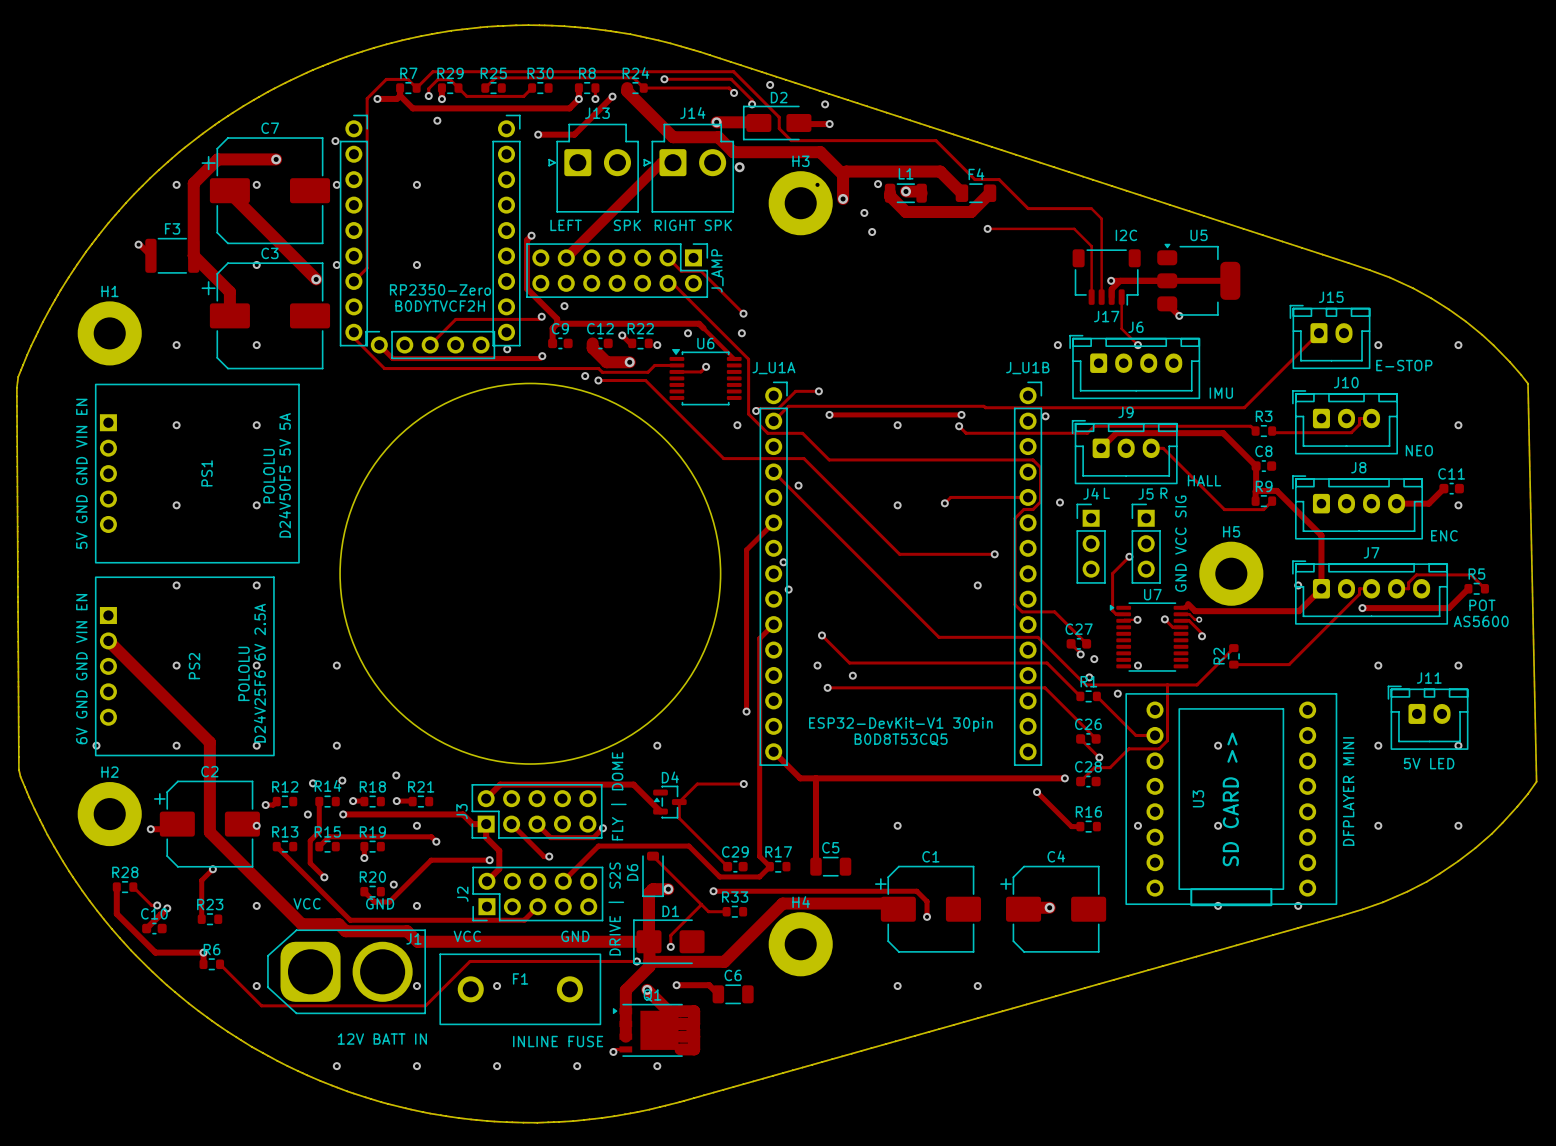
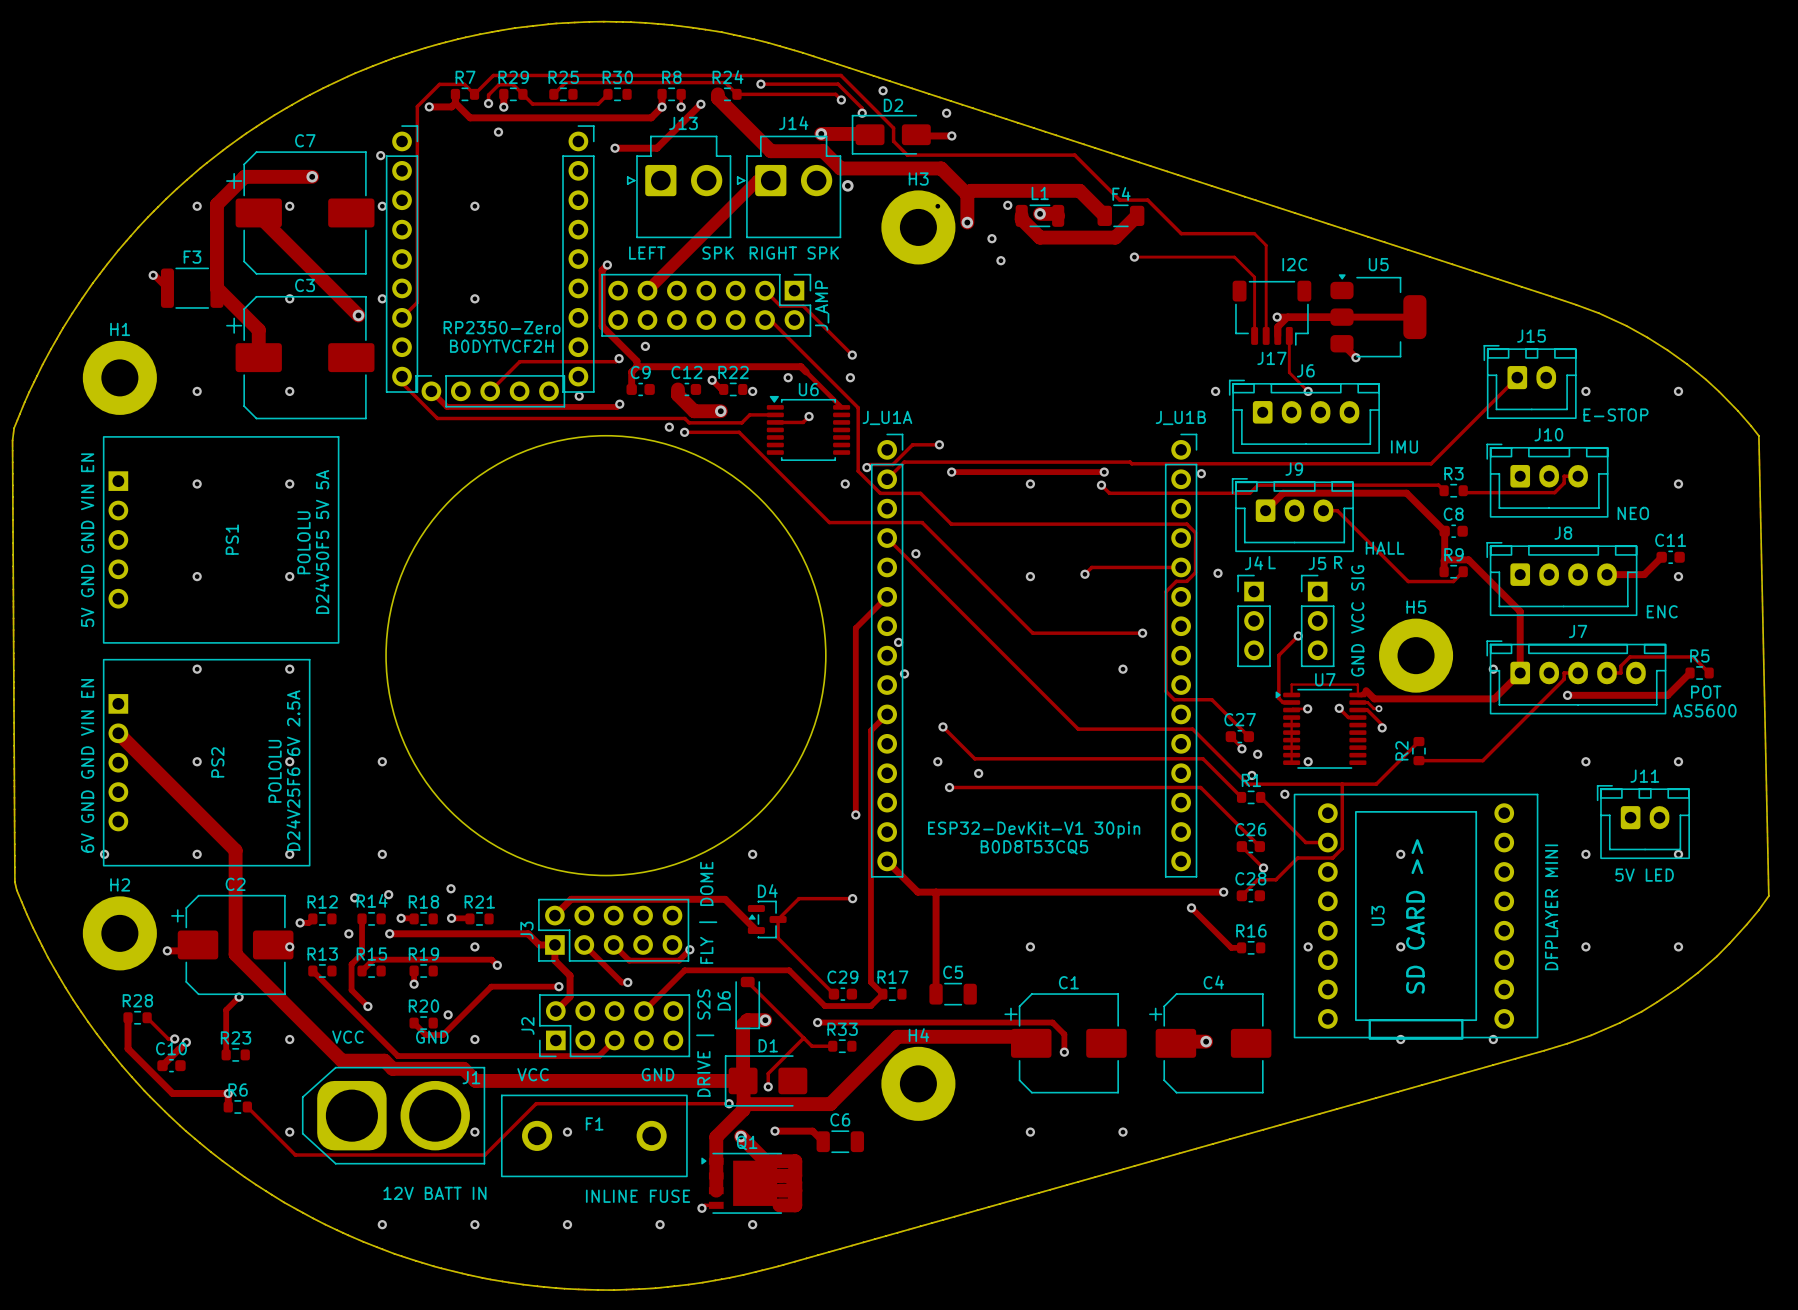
track: none -> (1291, 694) (1291, 684) (1357, 684) (1357, 694)
track: none -> (1291, 717) (1291, 762)

